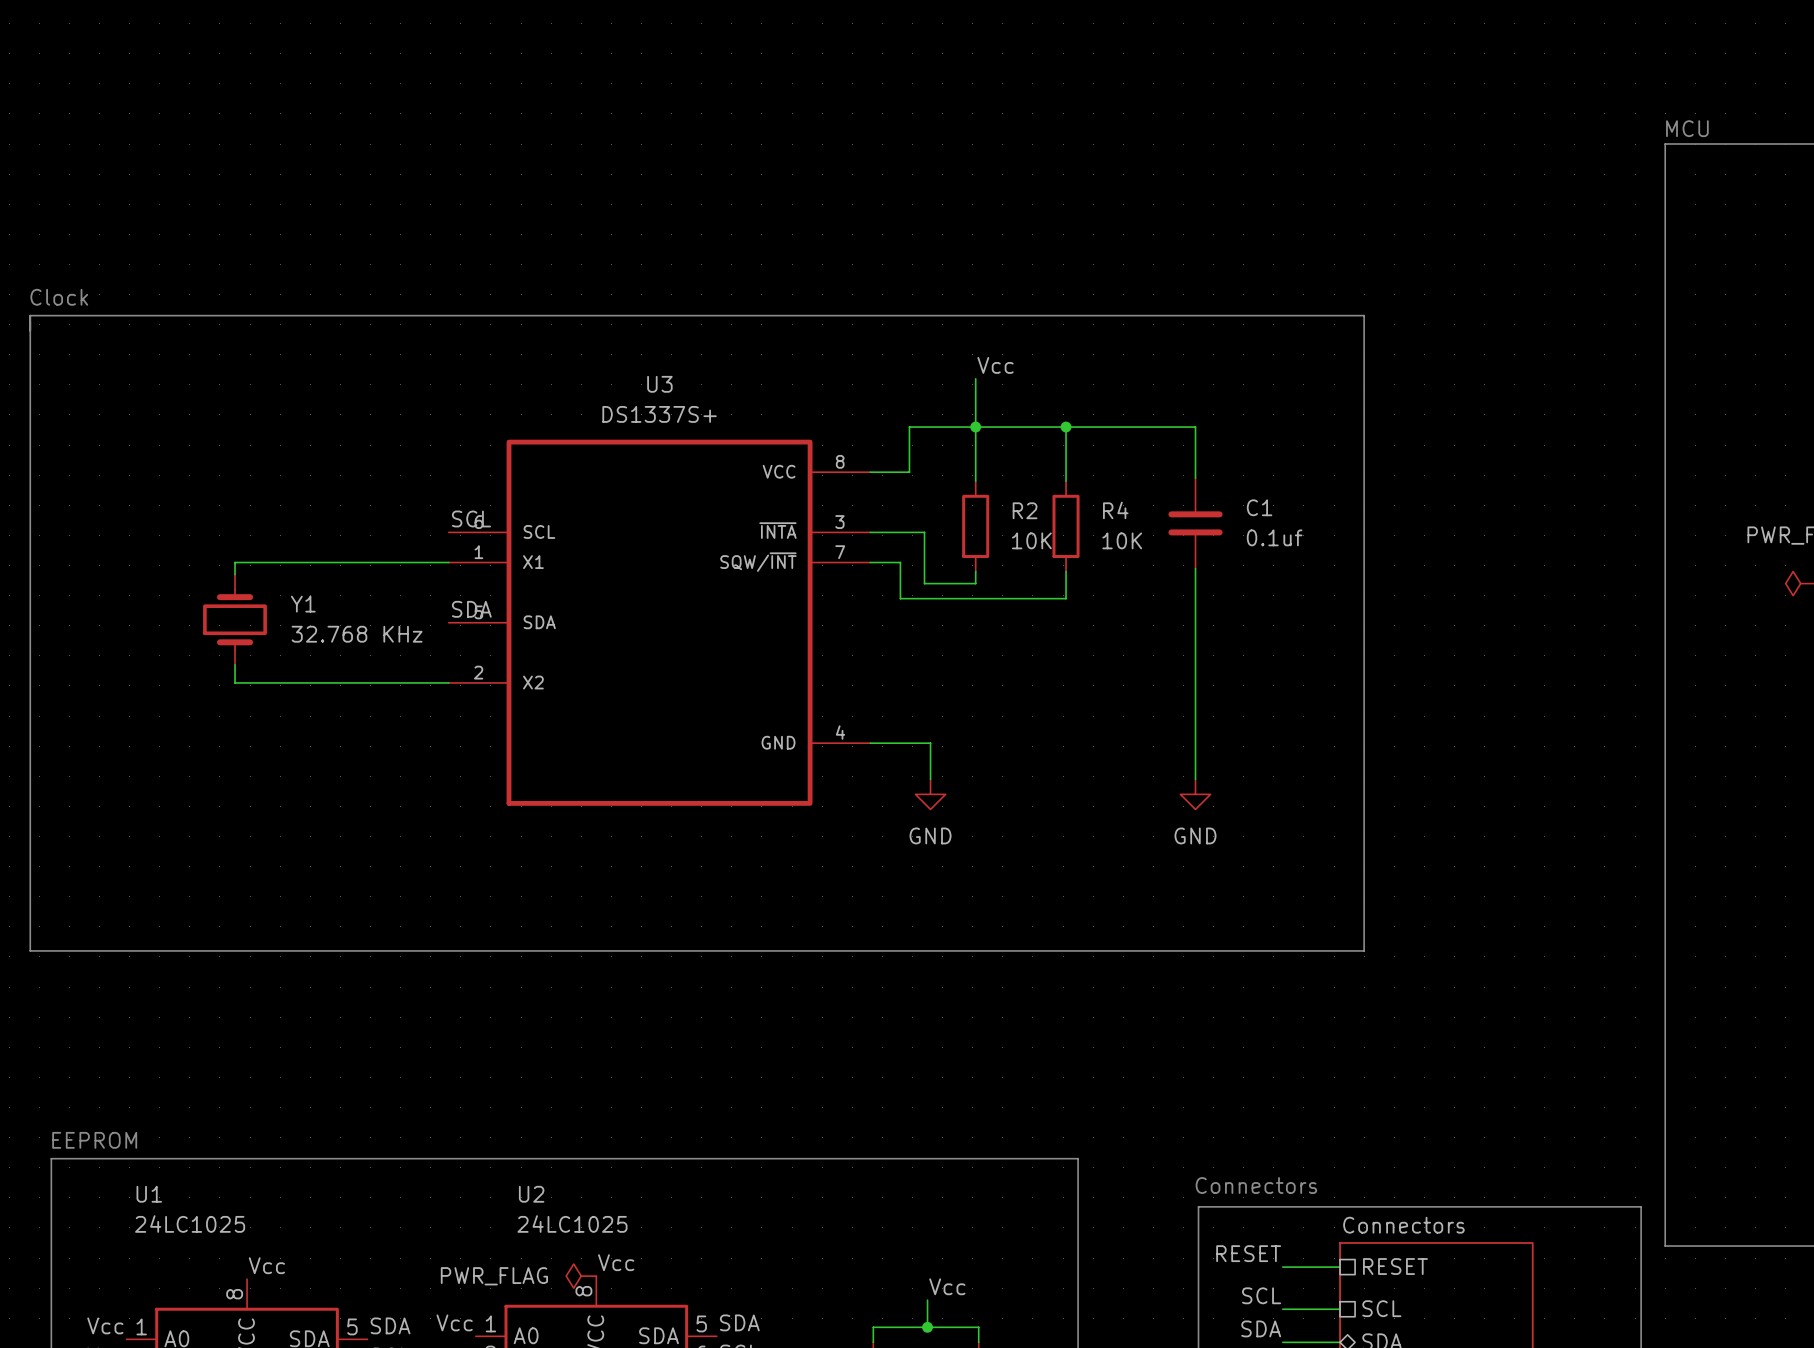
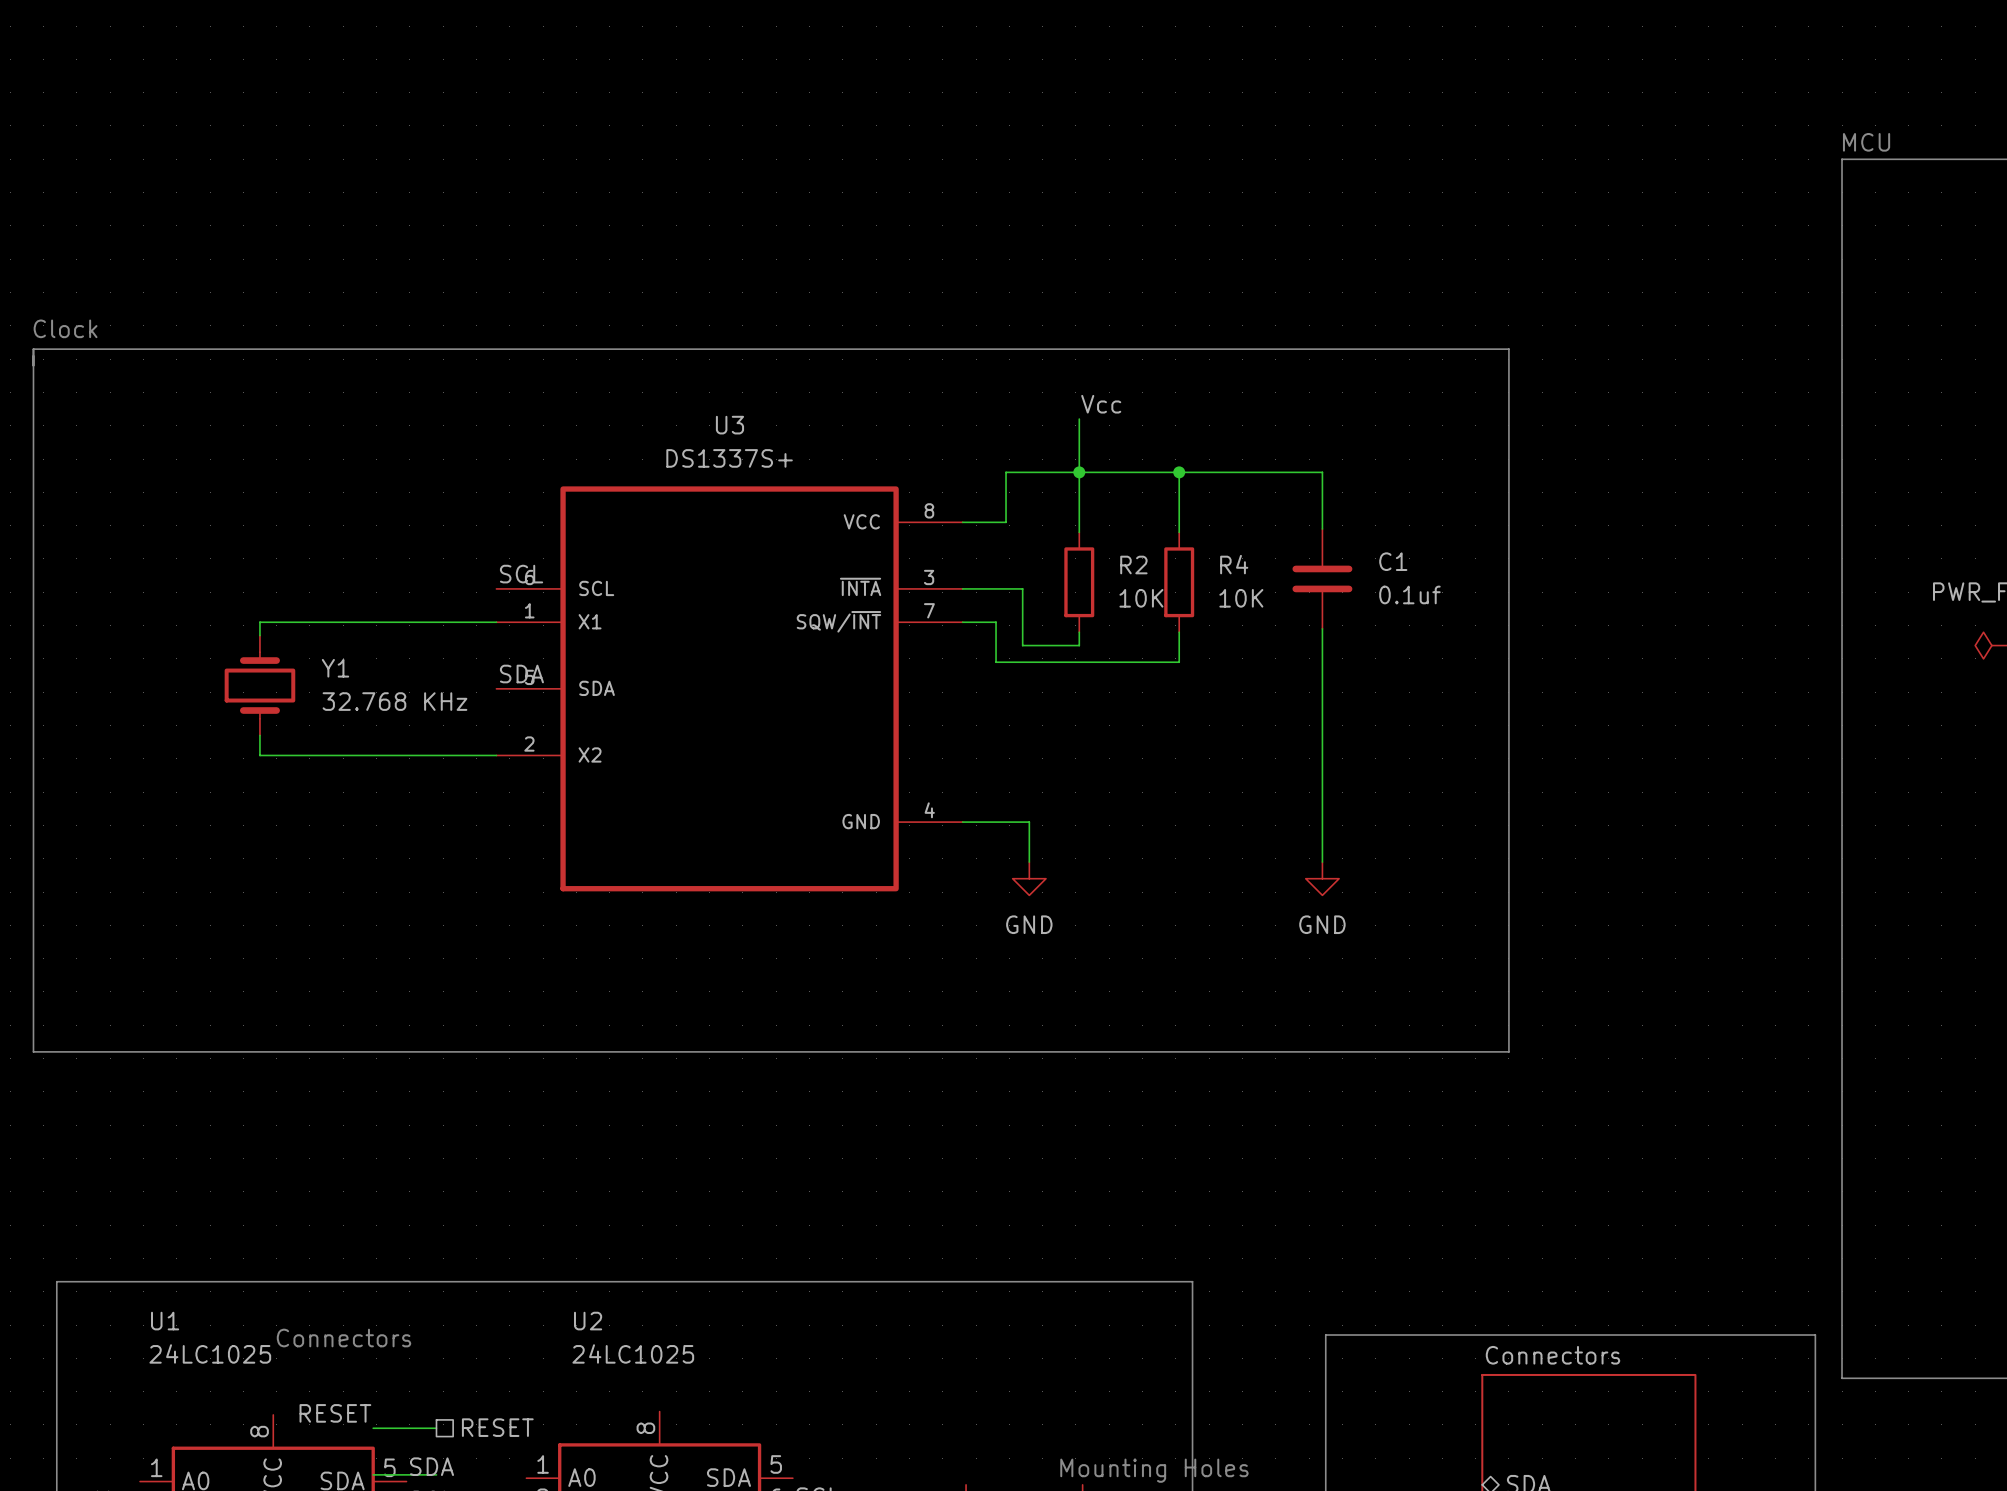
text: EEPROM (94, 1140) -> none
text: Connectors (1256, 1185) -> none
text: none -> Connectors (343, 1338)
label: RESET (1248, 1253) -> none
label: Vcc (616, 1262) -> none
label: Vcc (266, 1265) -> none
sheet pin: RESET (1395, 1266) -> none
wire: (1282, 1267) (1340, 1267) -> none
power symbol: PWR_FLAG (581, 1276) -> none
label: none -> RESET (335, 1413)
label: Vcc (947, 1286) -> none
sheet pin: none -> RESET (497, 1427)
wire: none -> (373, 1428) (436, 1428)
label: SCL (1261, 1295) -> none
wire: (927, 1300) (927, 1327) -> none
sheet pin: SCL (1381, 1308) -> none
wire: (1282, 1309) (1340, 1309) -> none
label: Vcc (454, 1322) -> none
label: SDA (739, 1322) -> none
label: Vcc (105, 1325) -> none
junction: (927, 1327) -> none
label: SDA (1261, 1328) -> none
text: none -> Mounting Holes (1154, 1470)
wire: none -> (373, 1474) (436, 1474)
wire: (873, 1342) (873, 1327) (978, 1327) (978, 1342) -> none
wire: (1282, 1342) (1340, 1342) -> none

